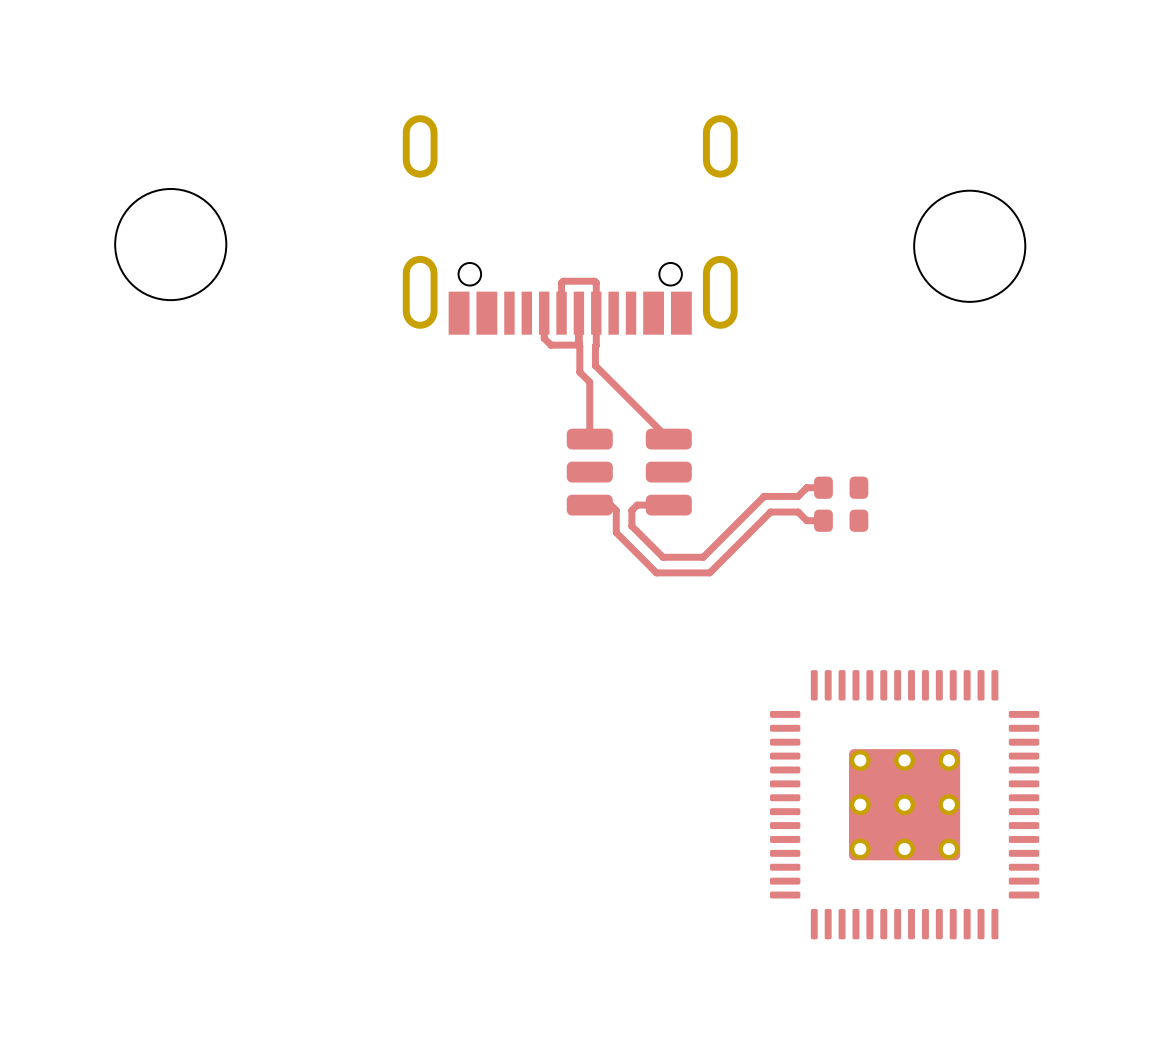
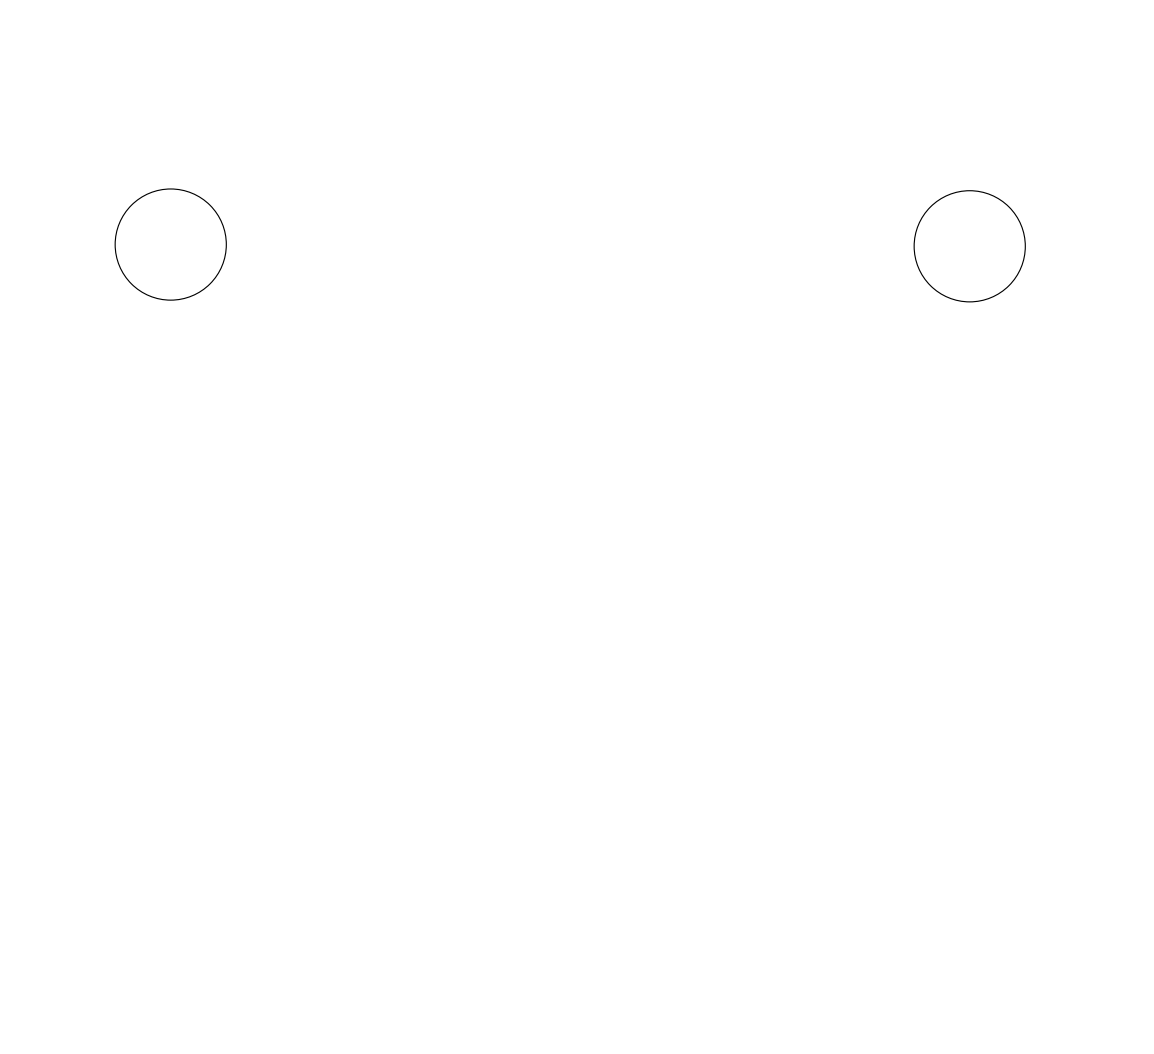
part: (570, 224) -> none
top track: (544, 313) (544, 338) (550, 345) (577, 345) (578, 343) -> none
top track: (561, 313) (561, 282) (563, 281) (594, 281) (596, 282) (595, 365) (668, 439) -> none
top track: (578, 313) (579, 372) (589, 382) (589, 439) -> none
part: (629, 472) -> none
top track: (823, 487) (806, 487) (798, 496) (764, 496) (703, 557) (662, 557) (631, 526) (631, 510) (637, 505) (668, 505) -> none
part: (841, 487) -> none
top track: (589, 505) (610, 505) (616, 510) (616, 532) (656, 572) (709, 572) (770, 512) (798, 512) (806, 520) (823, 520) -> none
part: (841, 520) -> none
part: (904, 804) -> none

